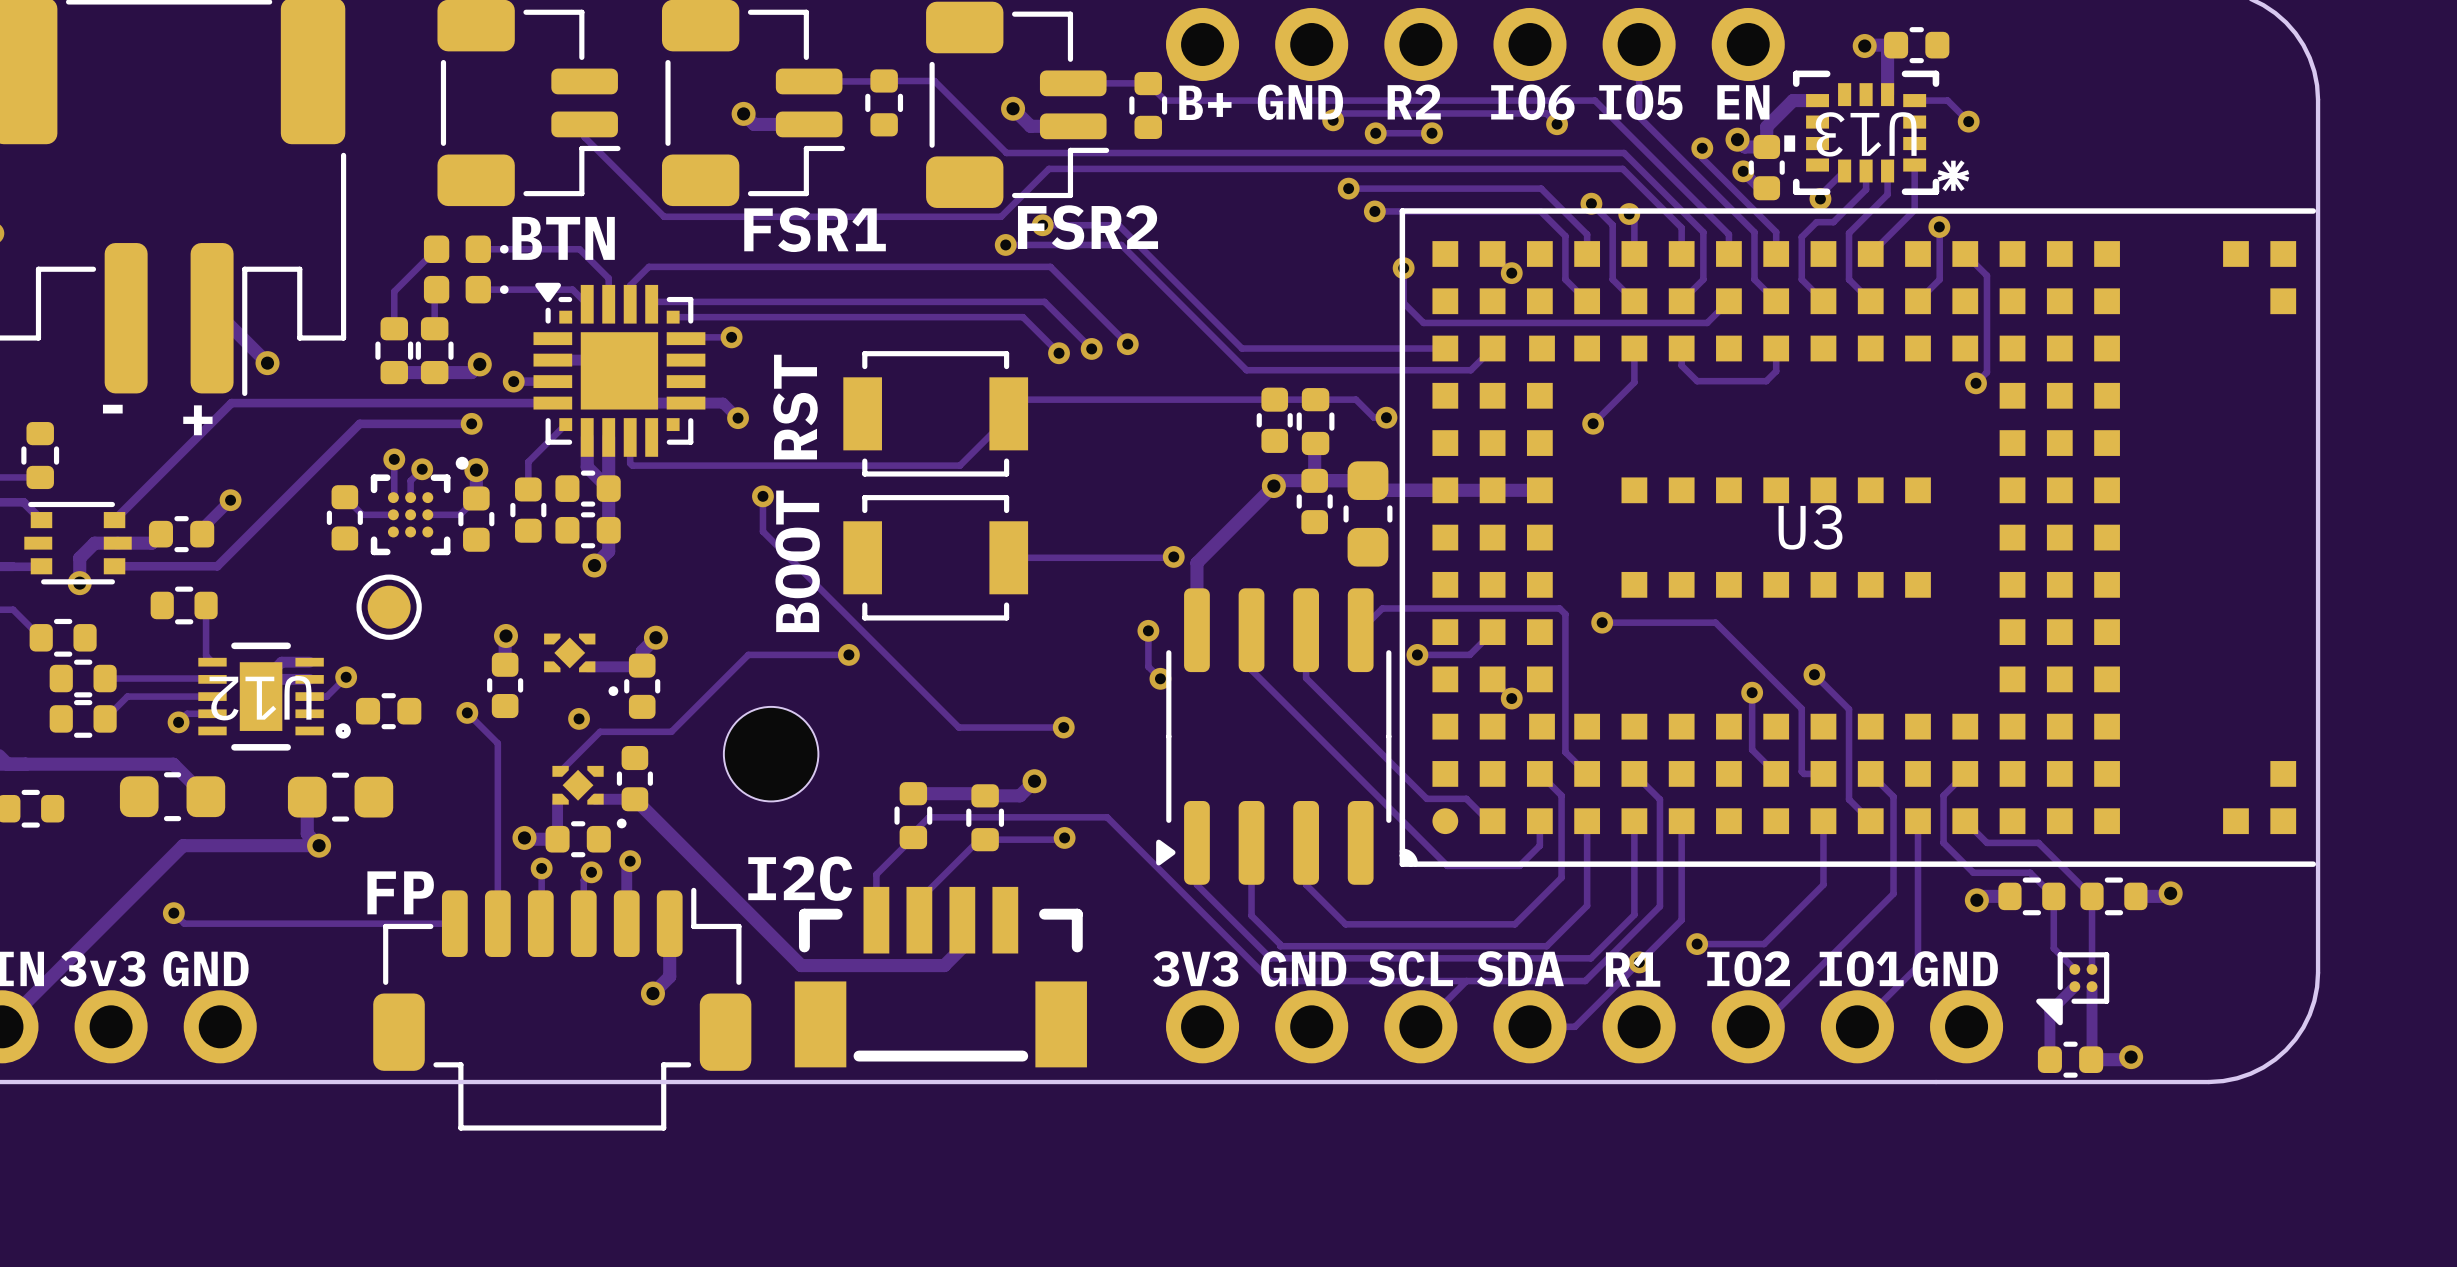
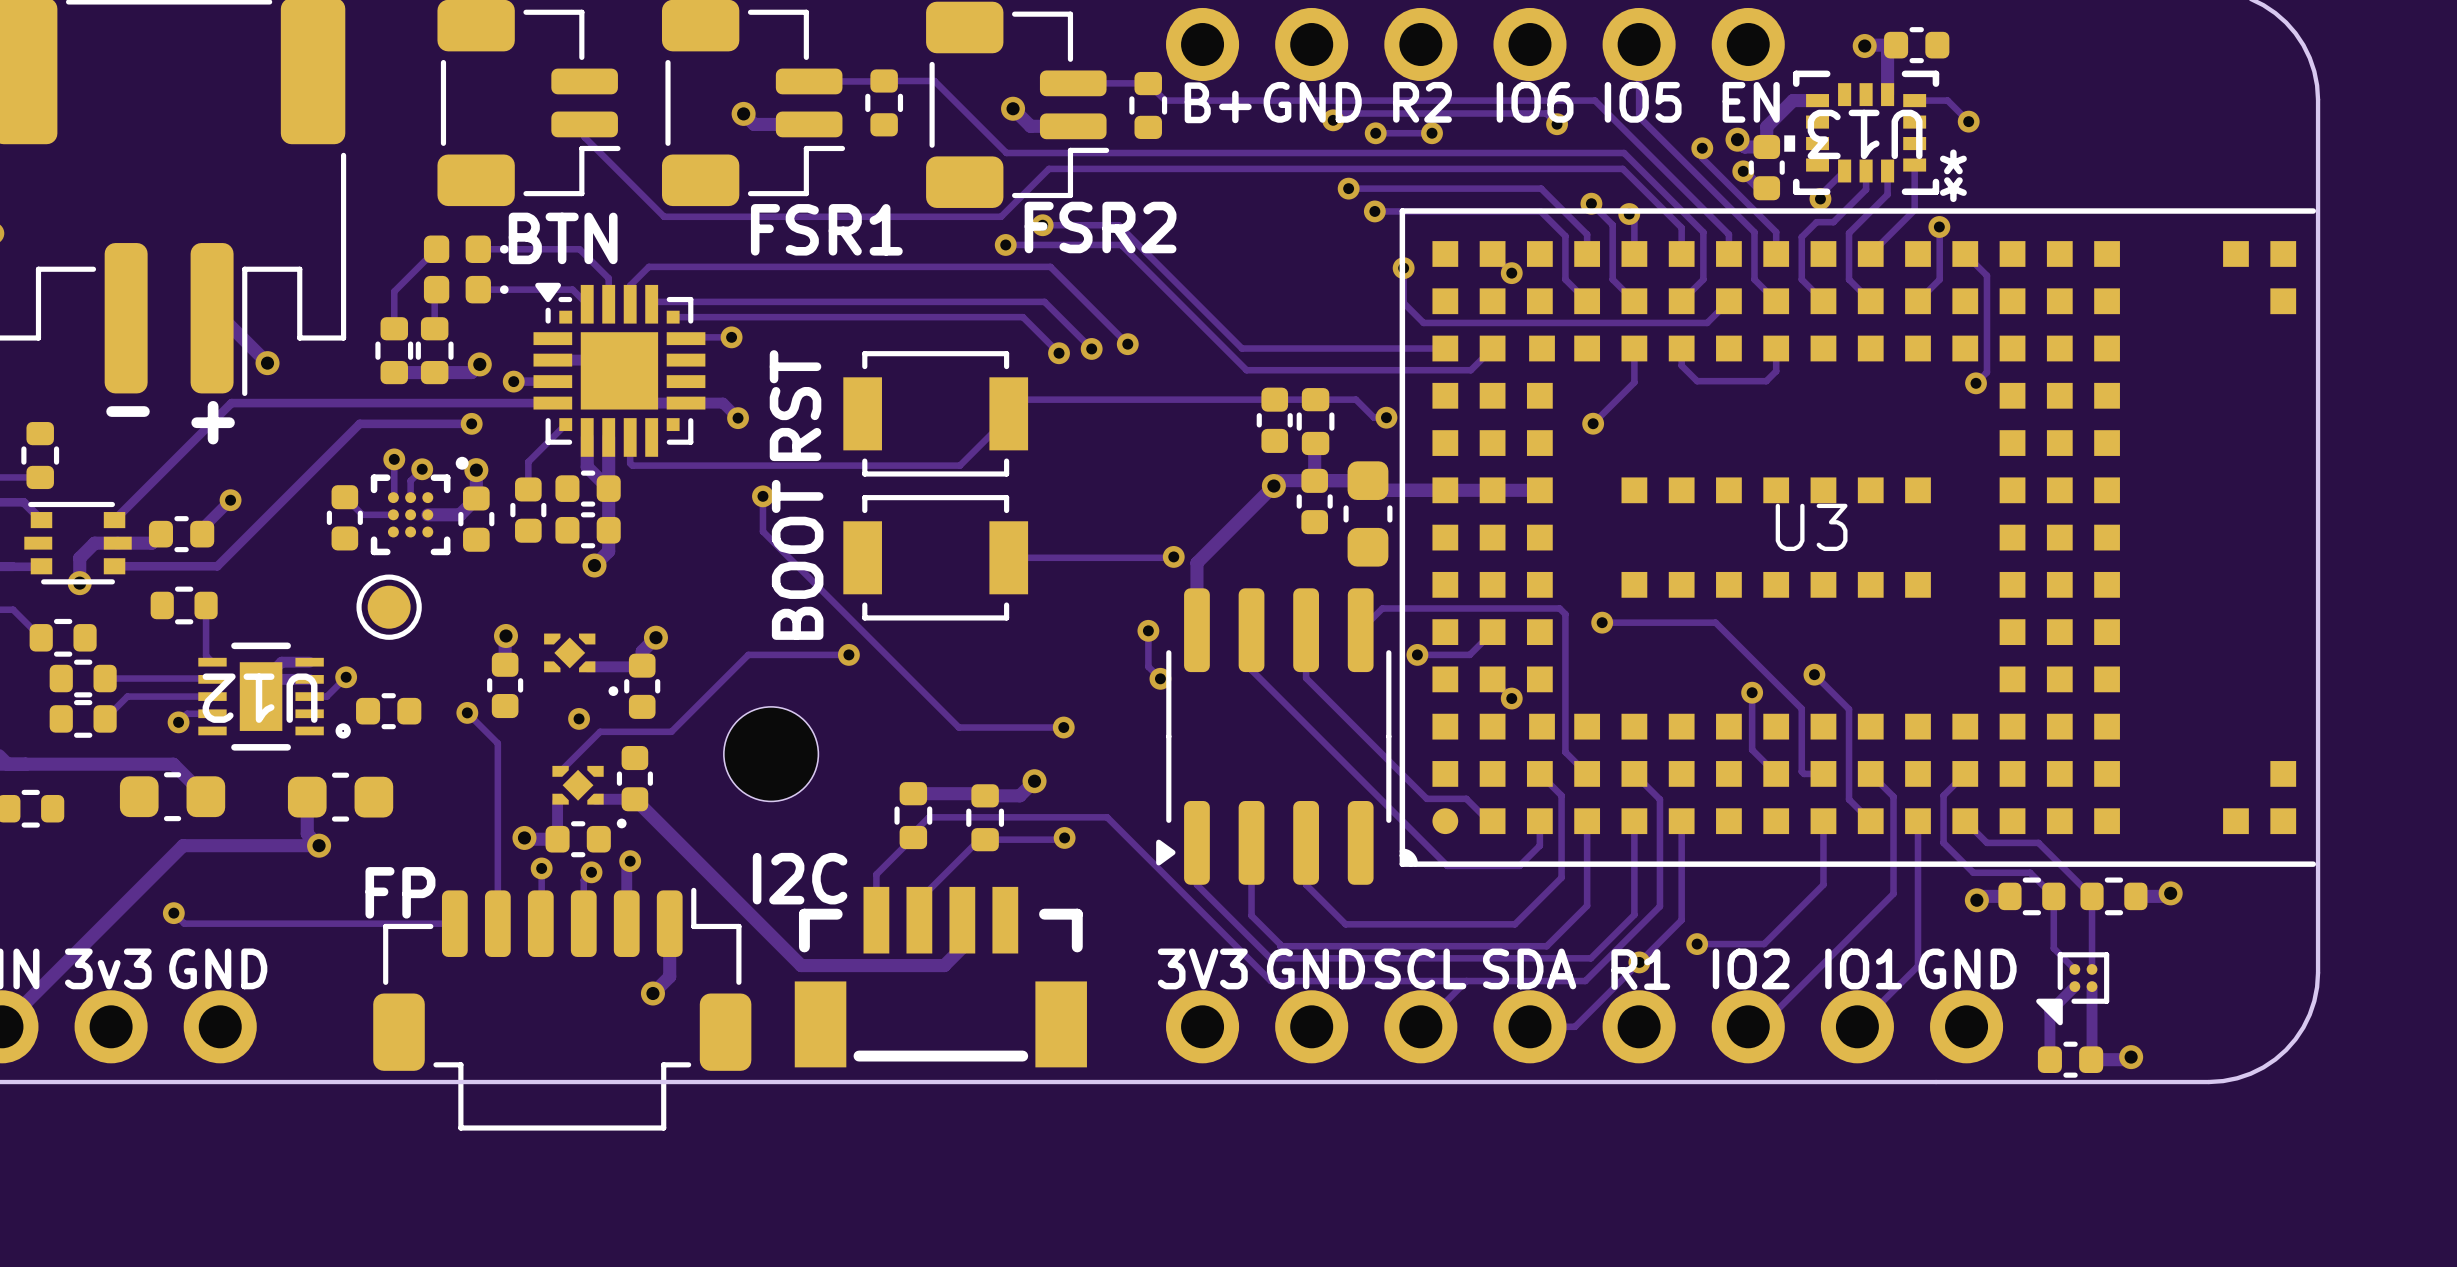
track width: thin (476, 498) (460, 514) (427, 514) -> thick (476, 498) (460, 514) (427, 514)

